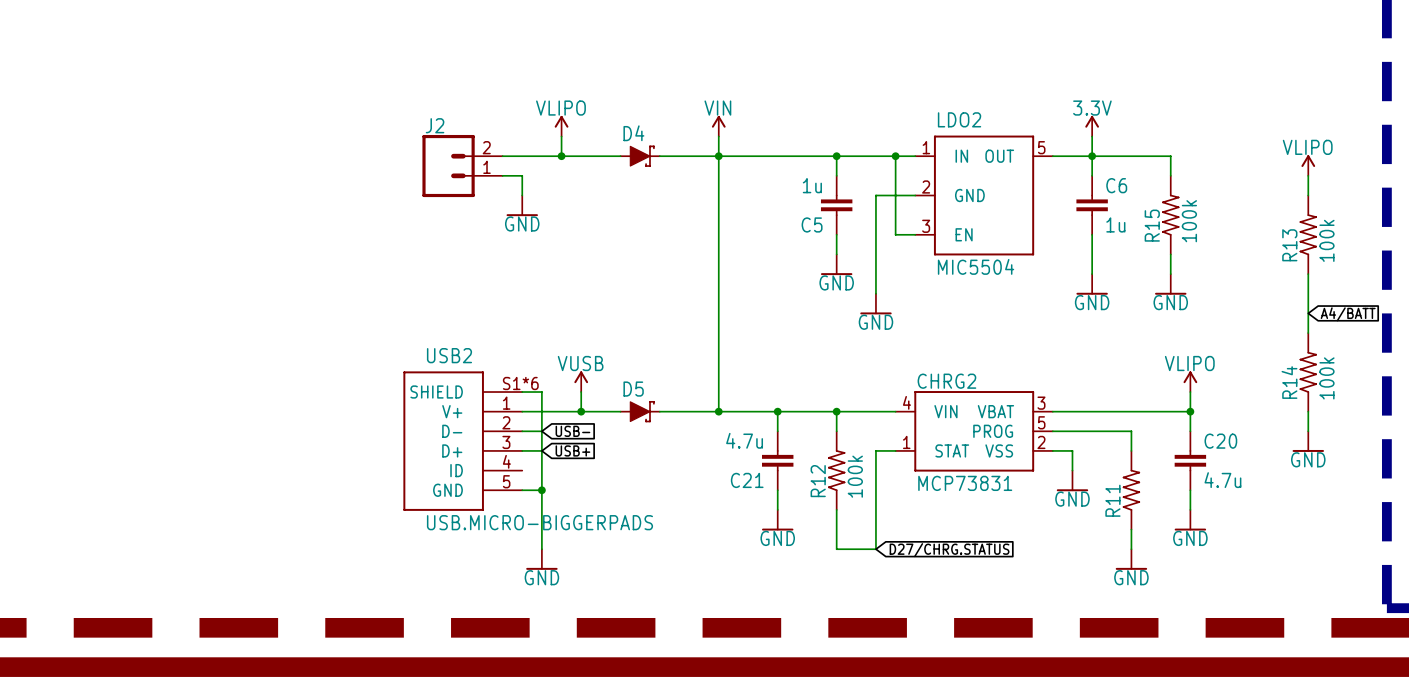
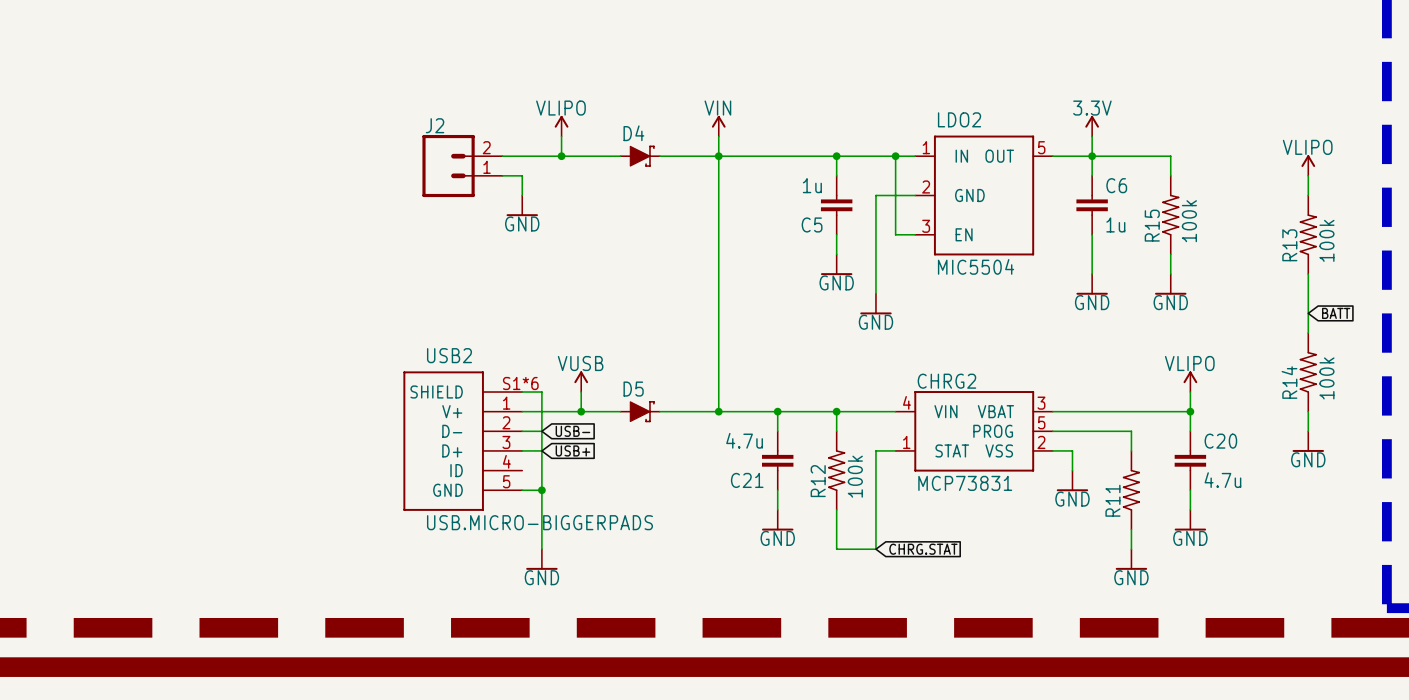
global label: A4/BATT (1348, 314) -> BATT (1336, 313)
global label: D27/CHRG.STATUS (949, 550) -> CHRG.STAT (923, 549)

